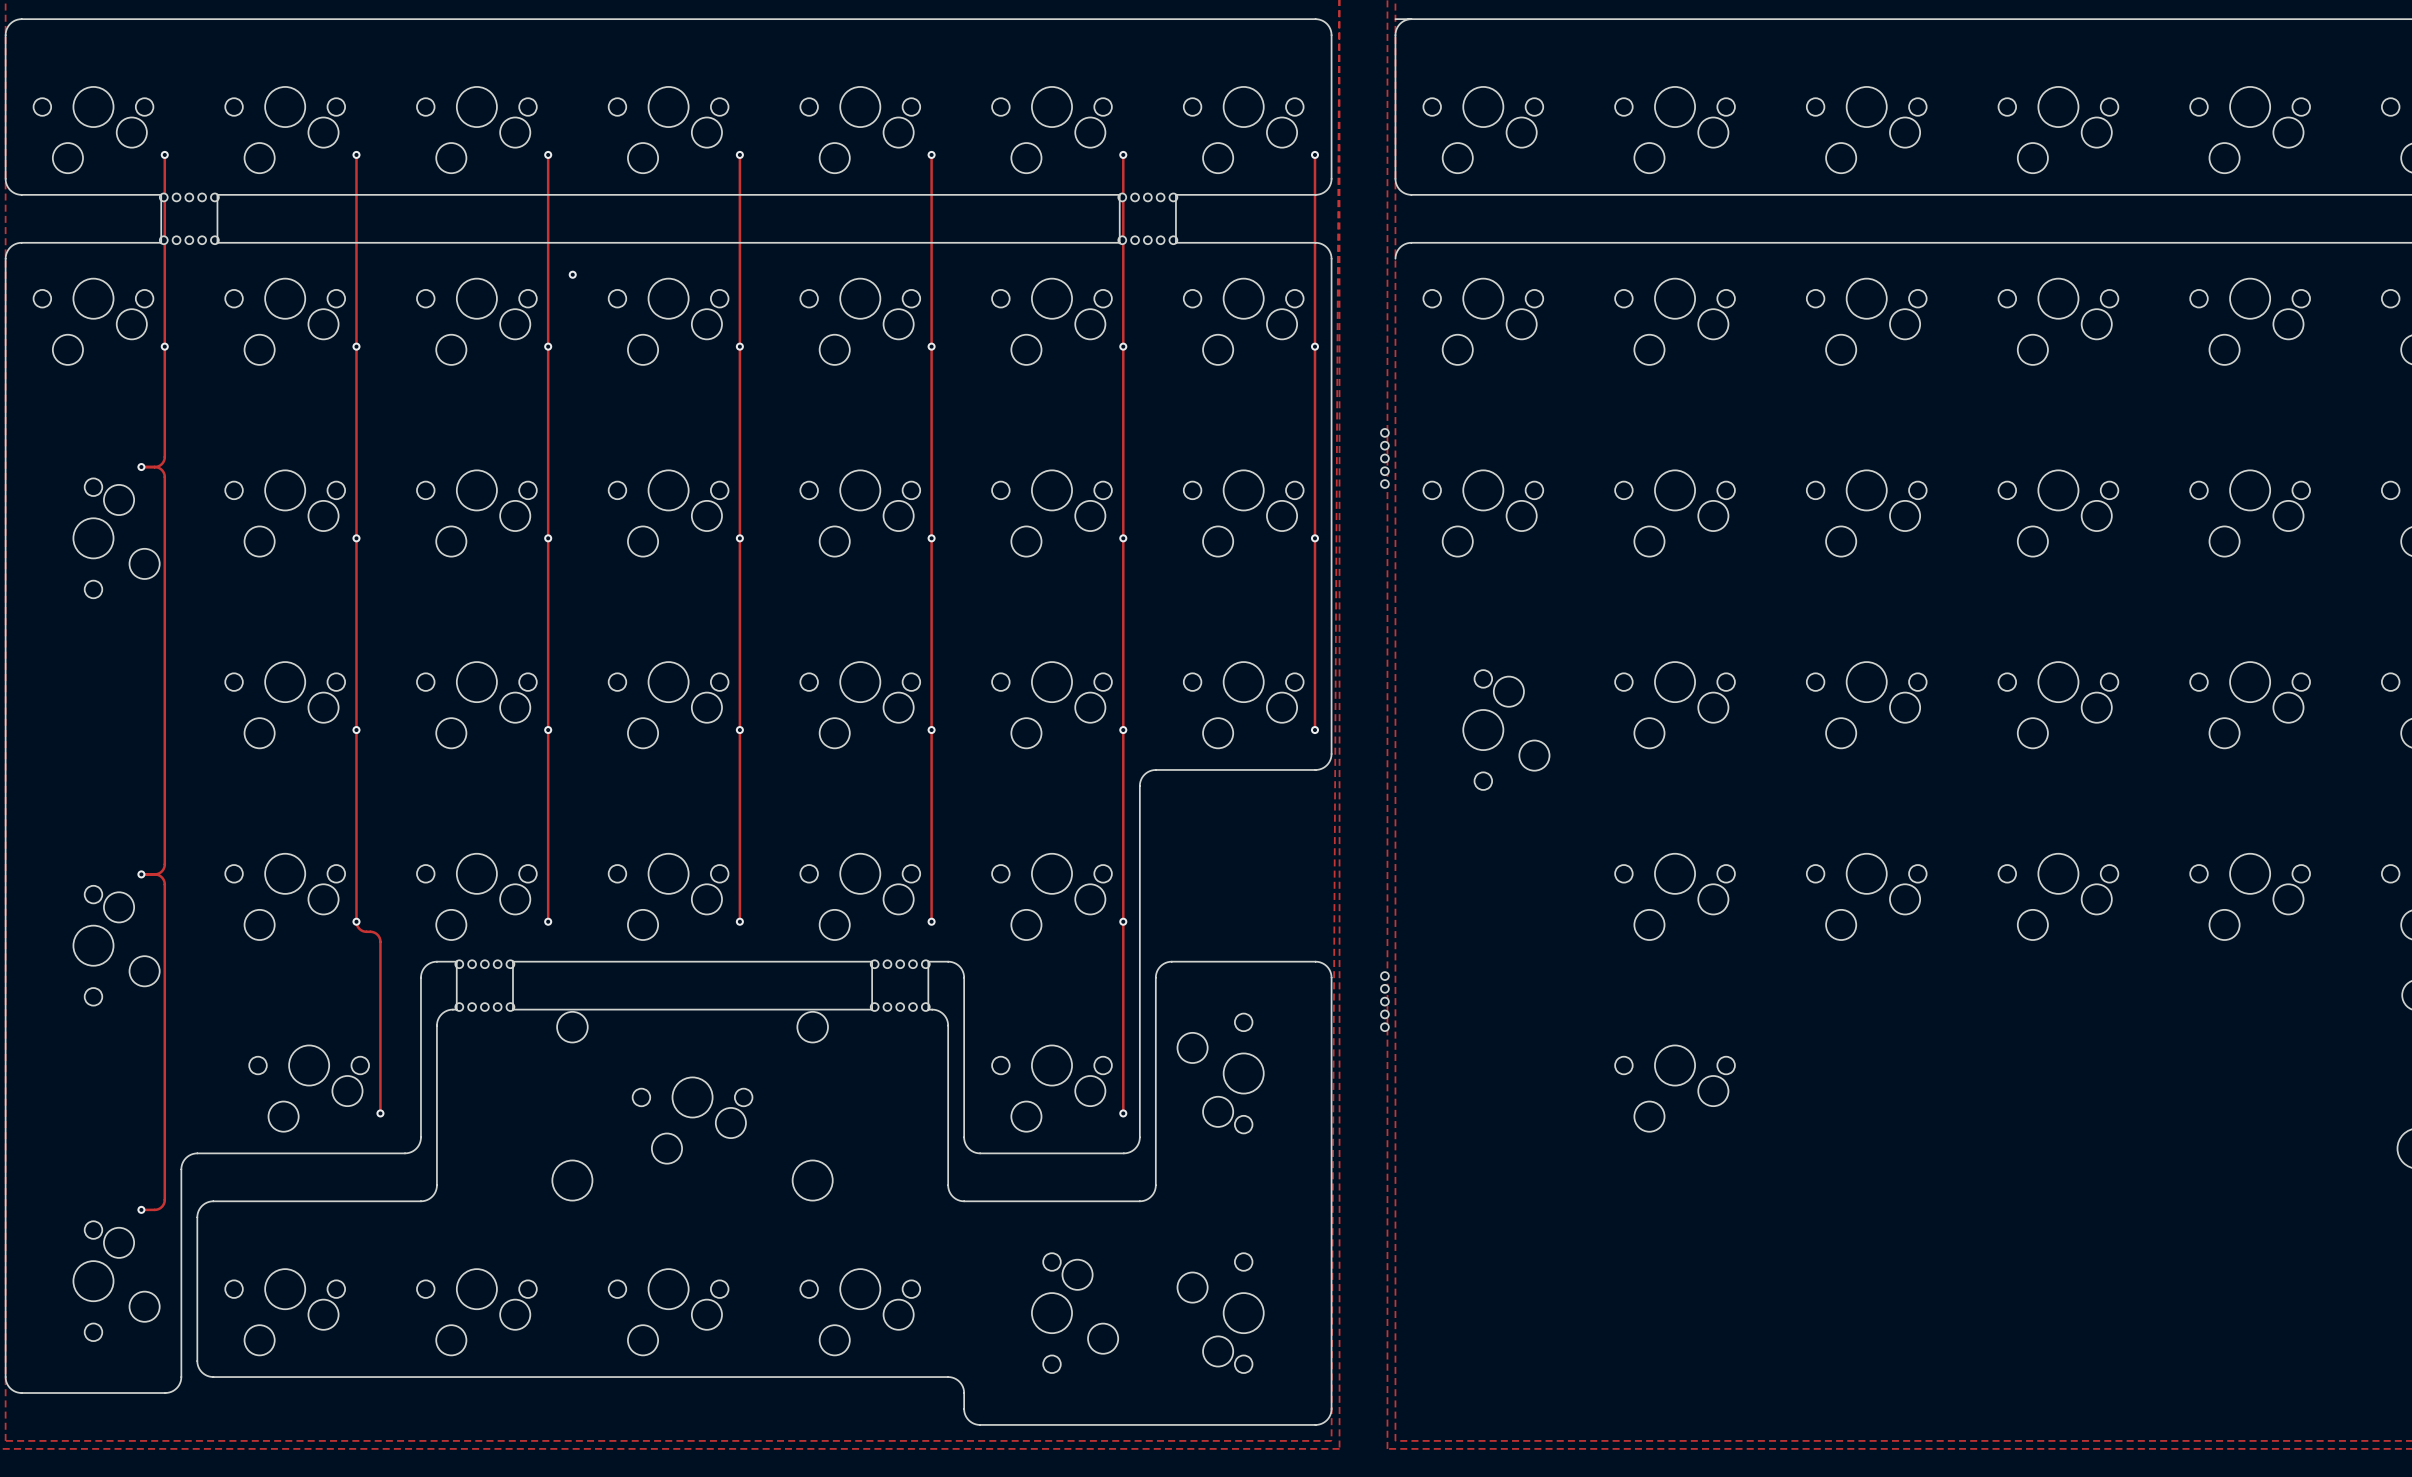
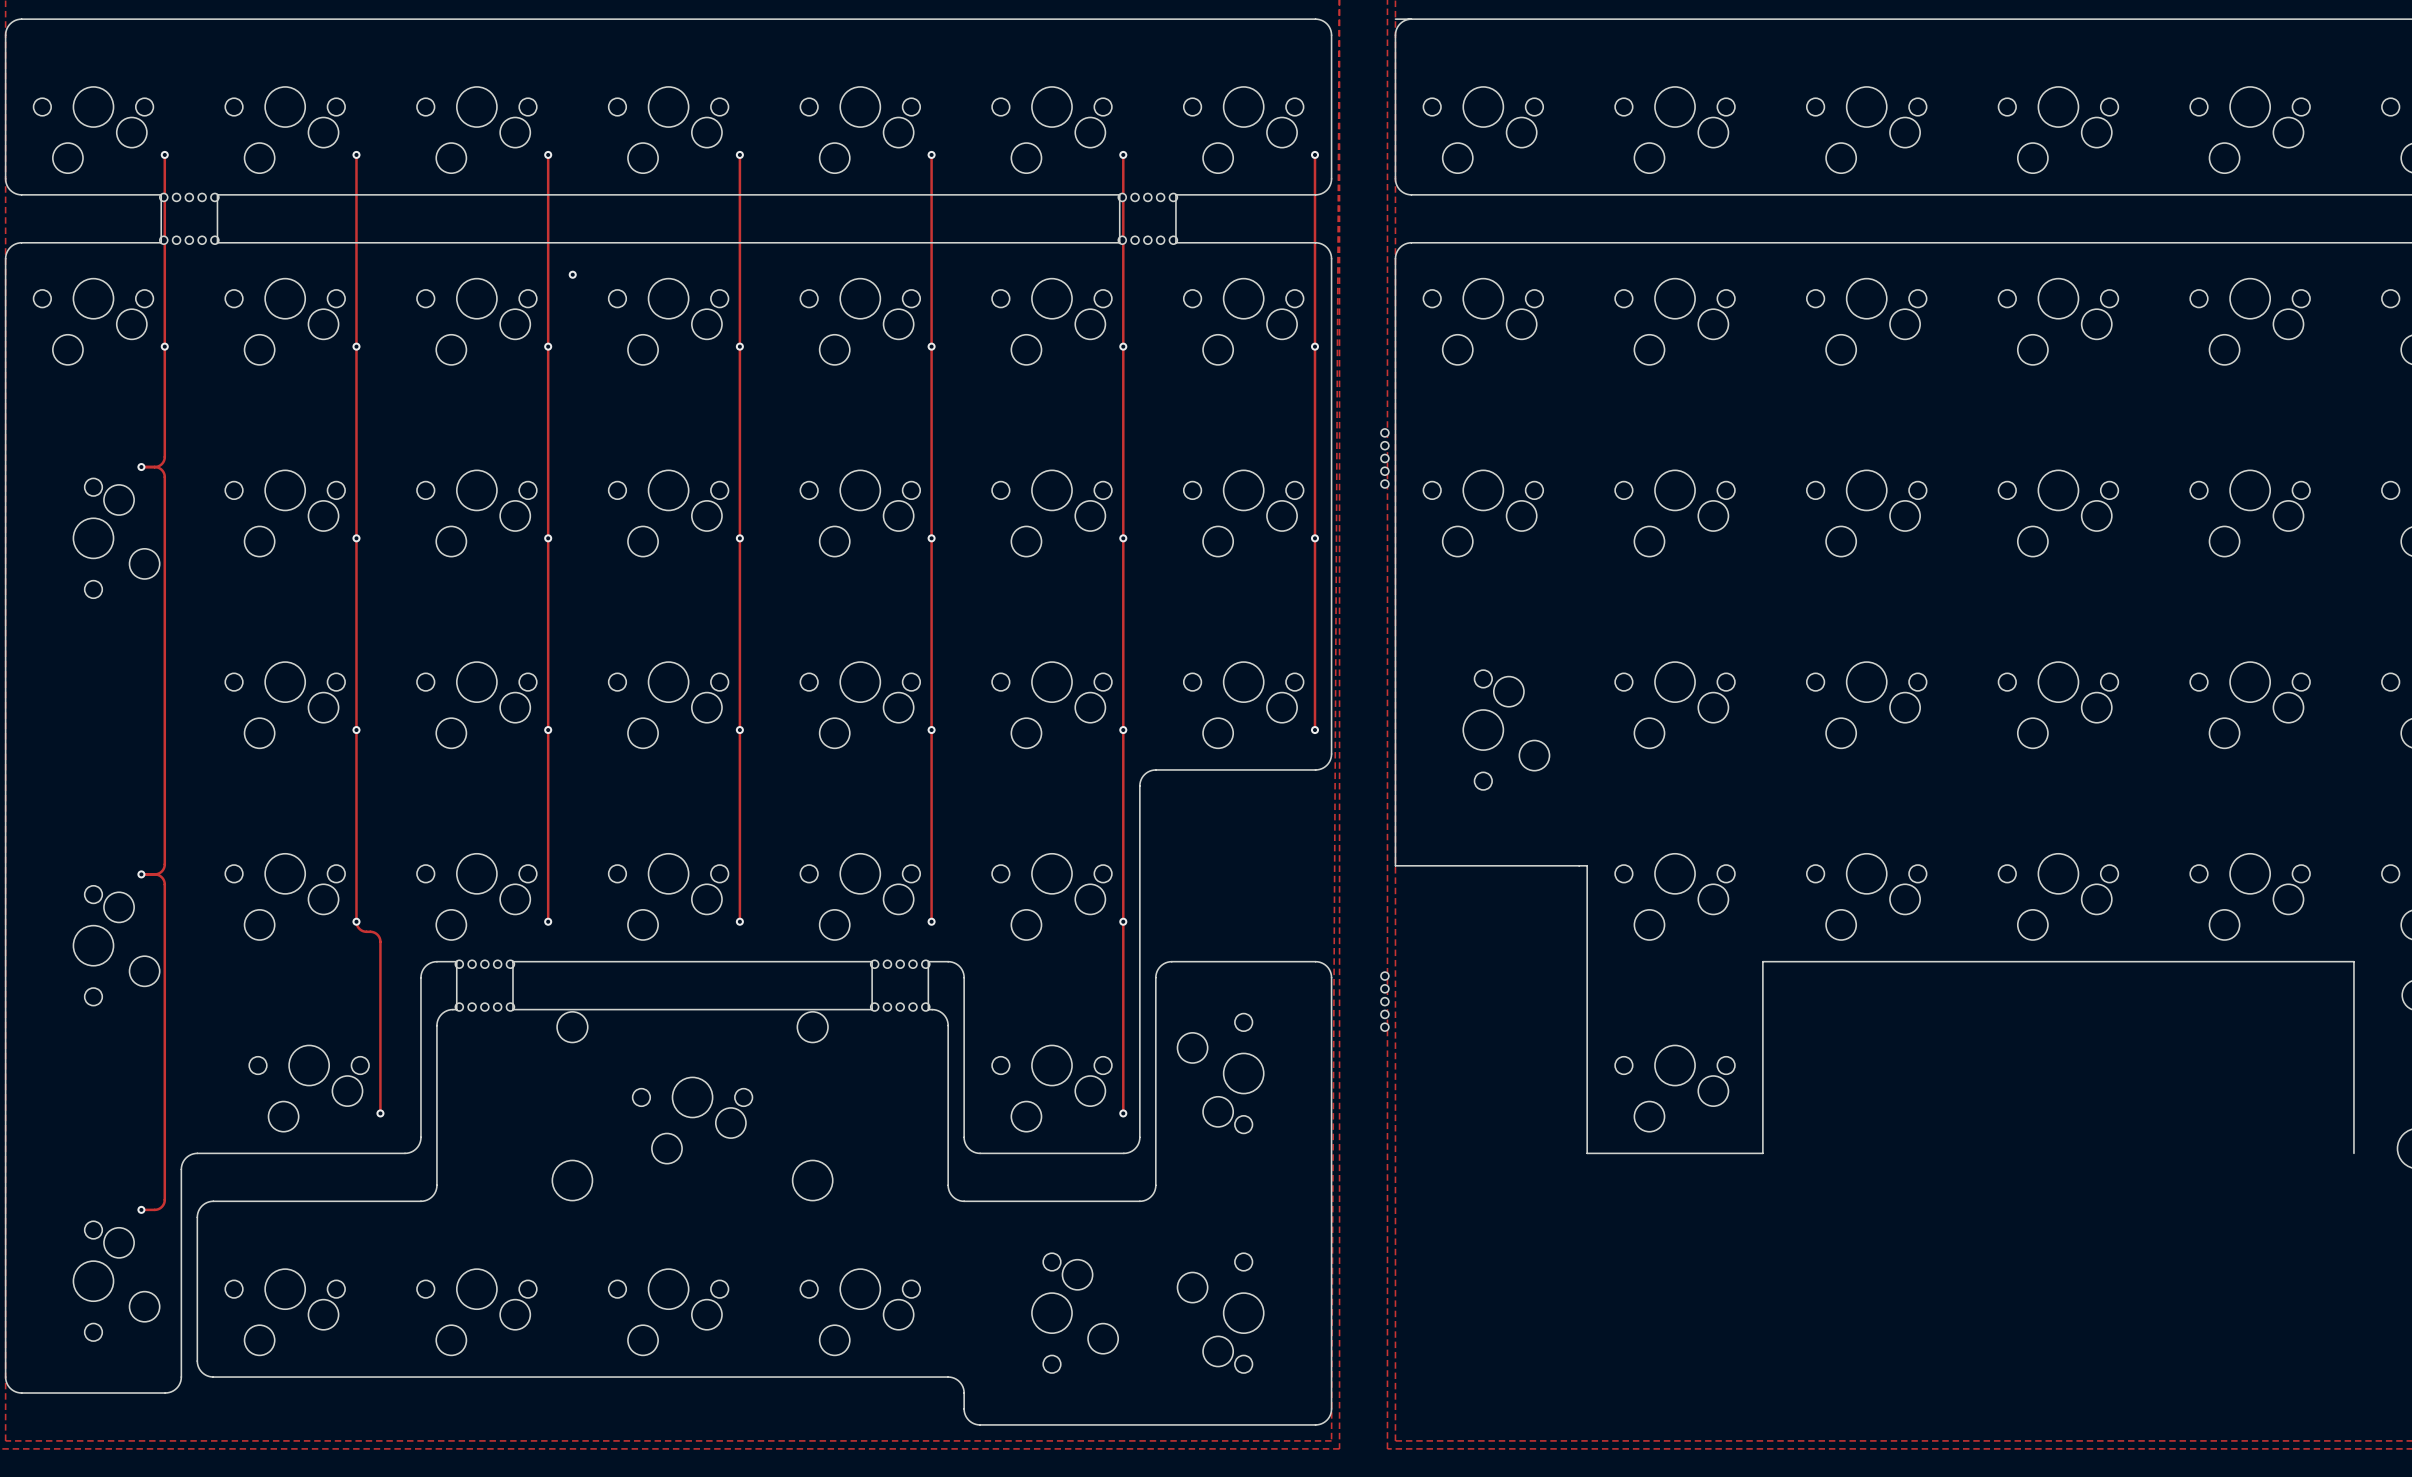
board edge: none -> (1395, 258) (1395, 865) (1587, 865) (1587, 1153) (1762, 1153) (1762, 961) (2353, 961) (2353, 1153)

